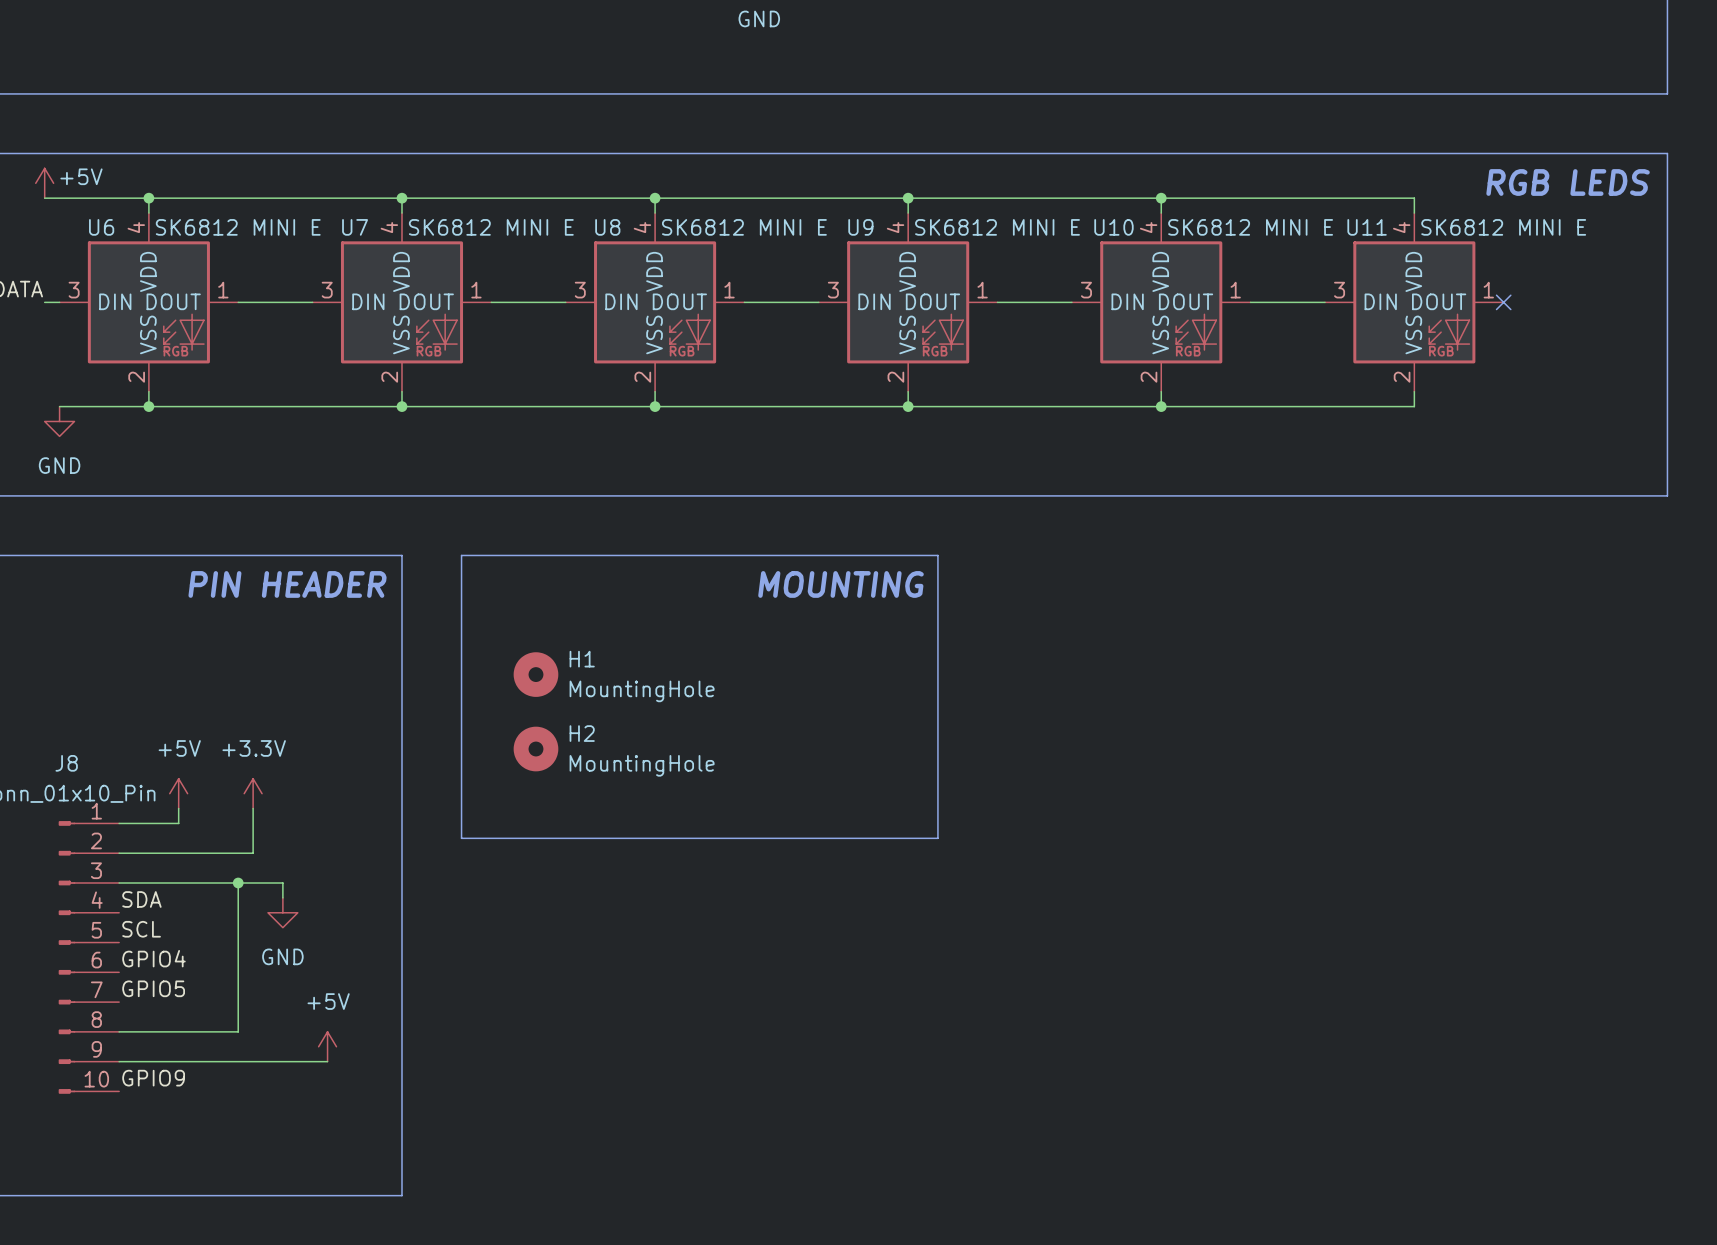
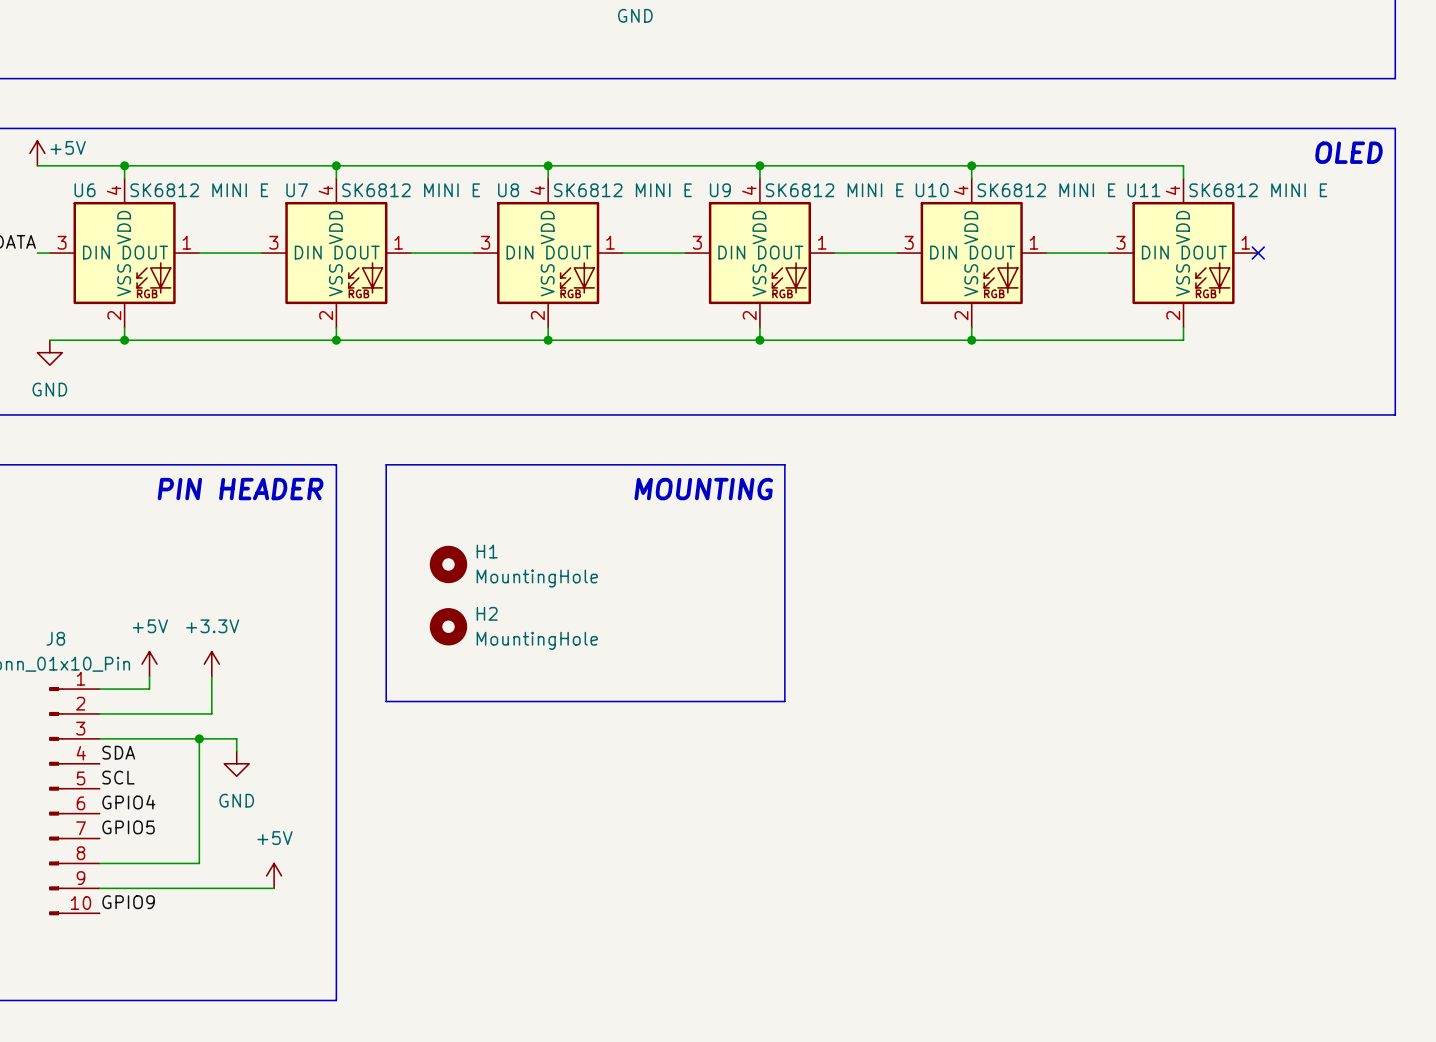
text: RGB LEDS (1568, 182) -> none
text: none -> OLED (1349, 152)

